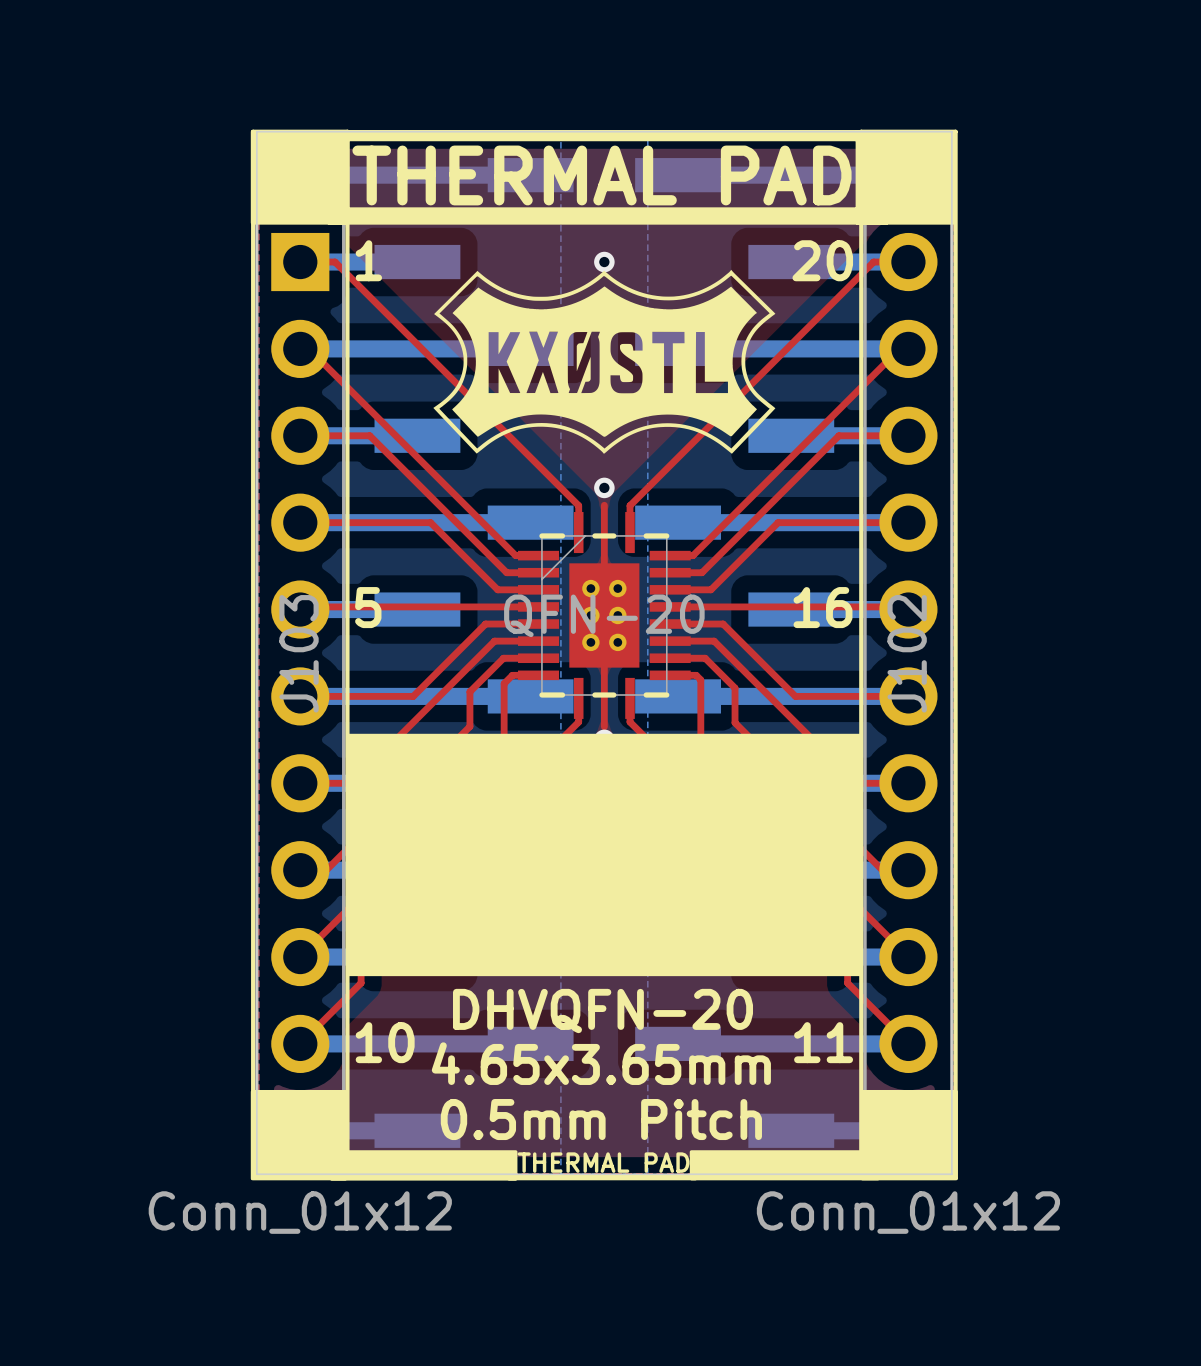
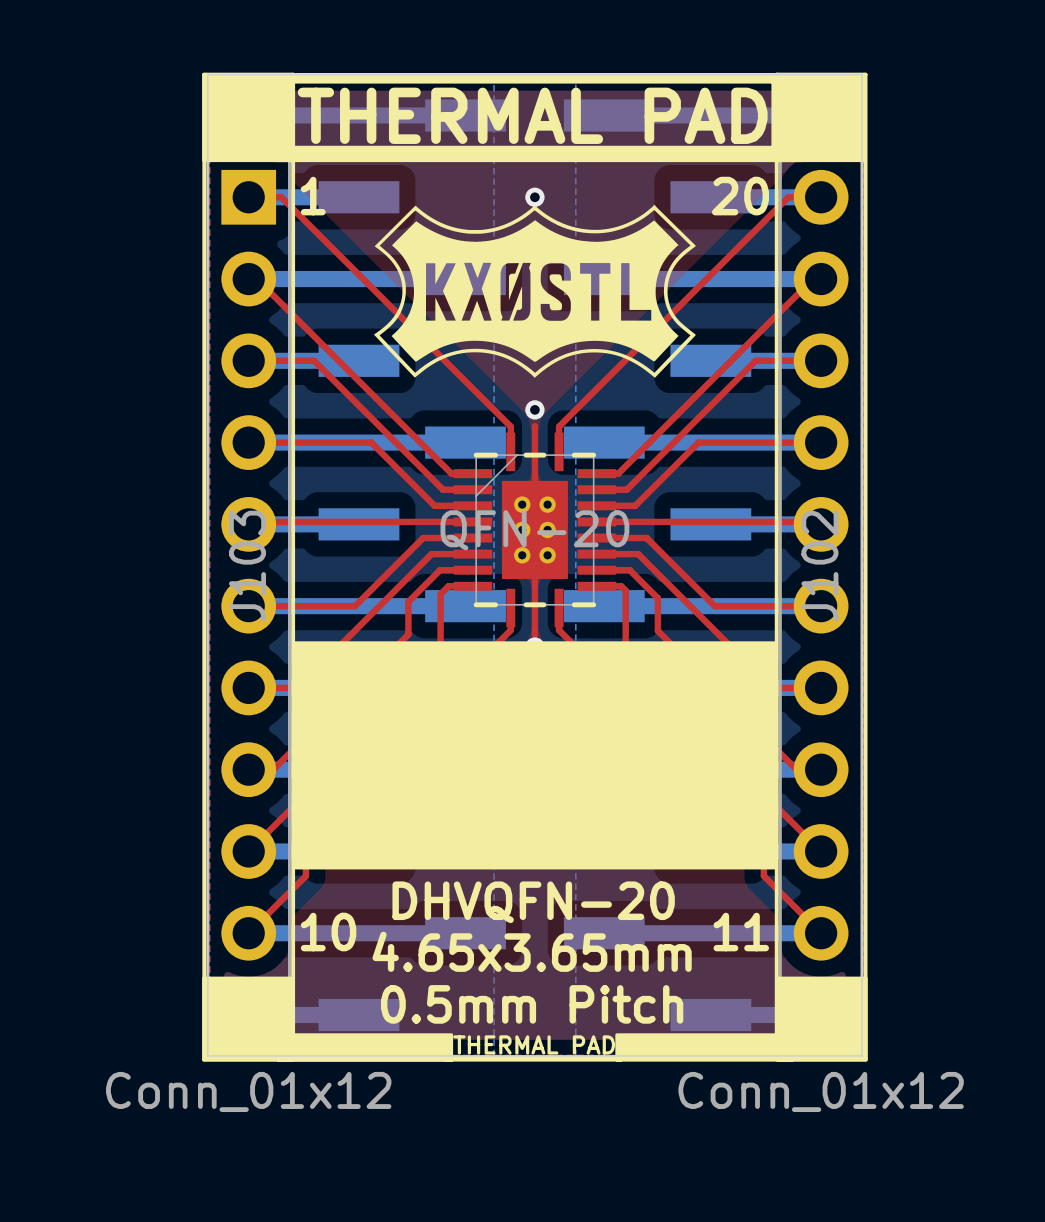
text: 5 (368, 607) -> none
text: 16 (822, 607) -> none

